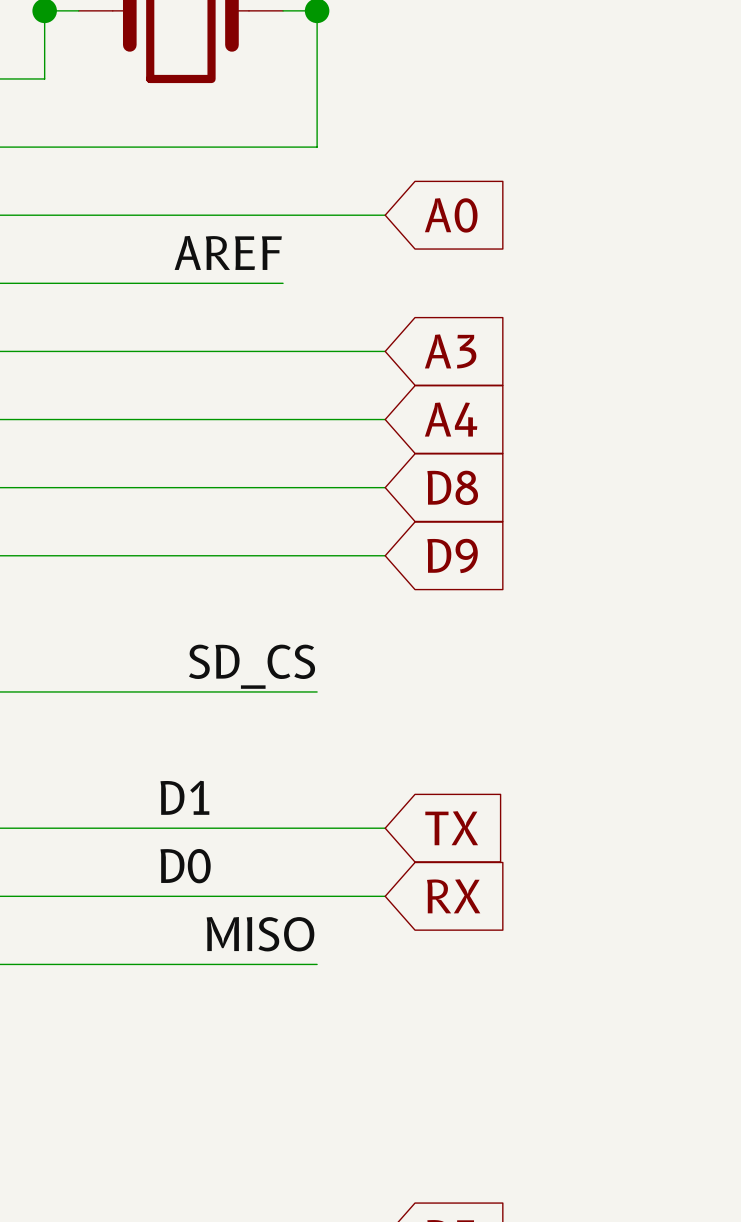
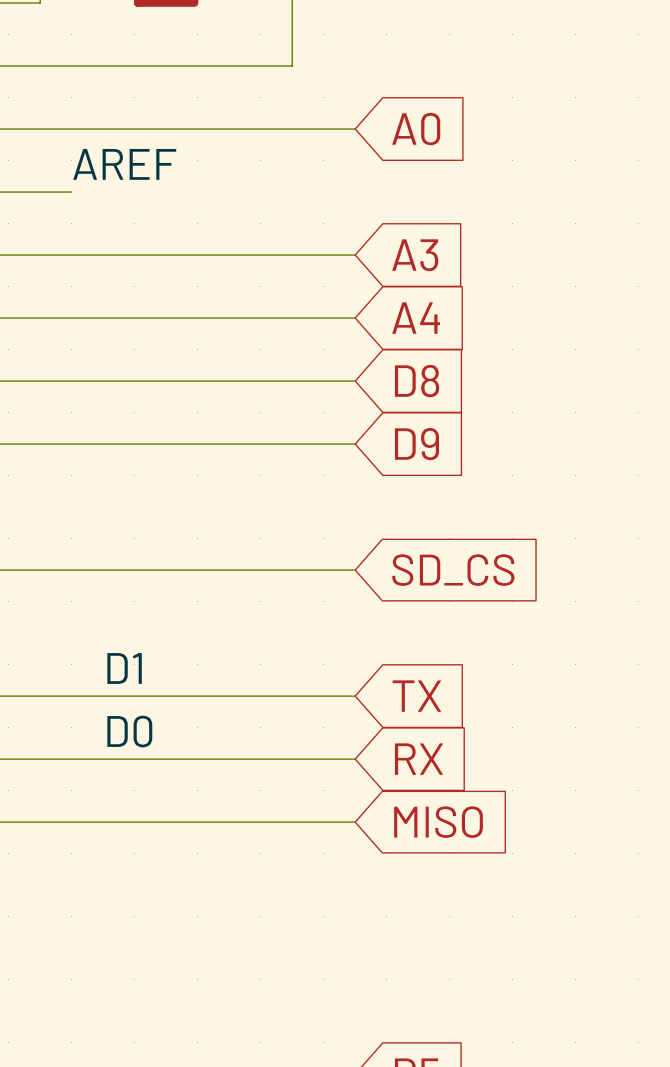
label position: AREF (228, 252) -> AREF (124, 164)
wire: (78, 283) (283, 283) -> none
label: SD_CS (252, 666) -> none
wire: none -> (292, 570) (355, 570)
global label: none -> SD_CS (453, 570)
label position: D1 (184, 797) -> D1 (124, 668)
label position: D0 (185, 866) -> D0 (129, 731)
label: MISO (260, 934) -> none
wire: none -> (292, 822) (355, 822)
global label: none -> MISO (438, 822)

